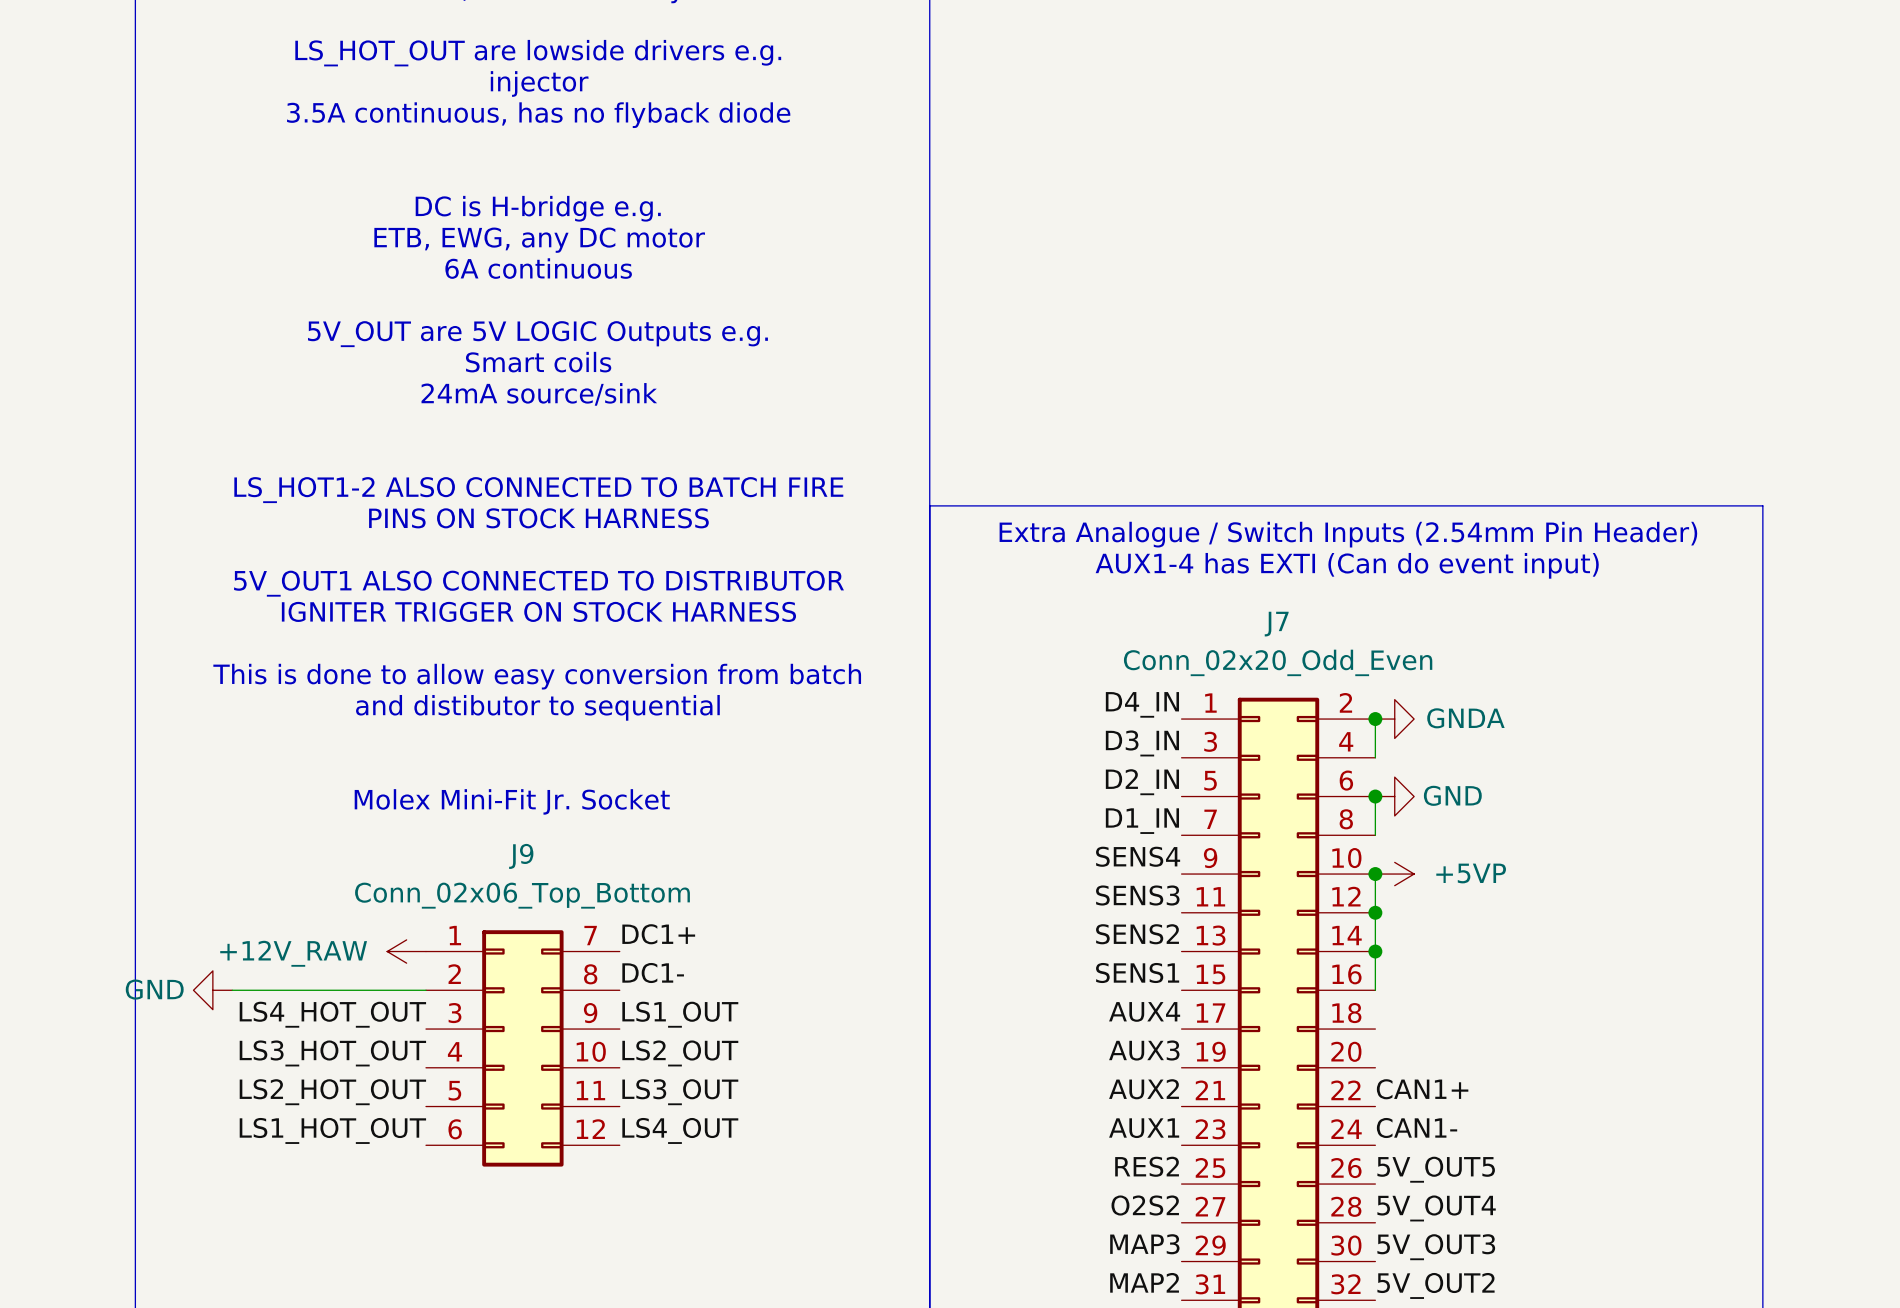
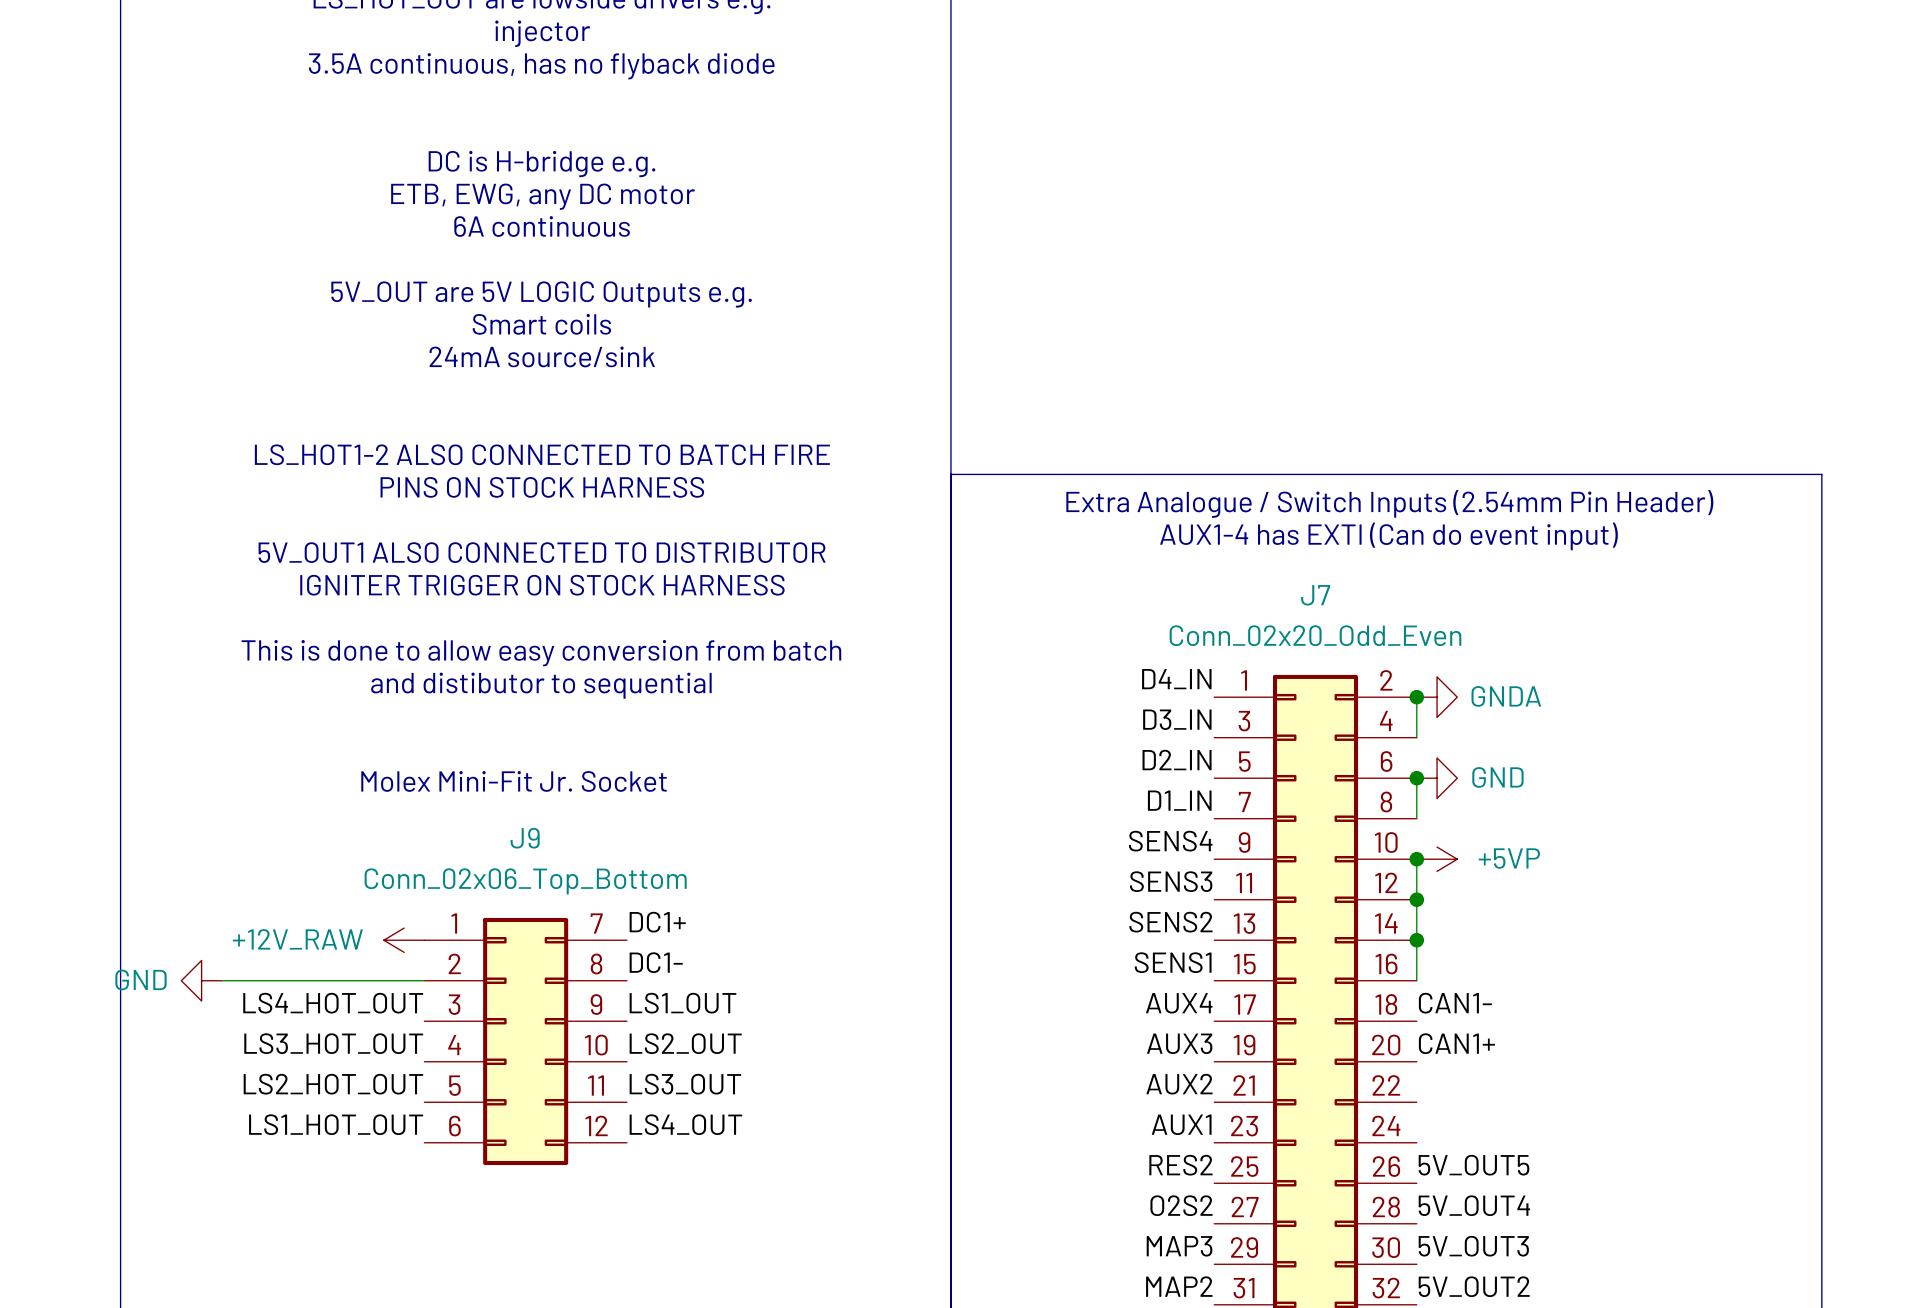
label position: CAN1+ (1422, 1089) -> CAN1+ (1456, 1043)
label position: CAN1- (1417, 1128) -> CAN1- (1455, 1003)

